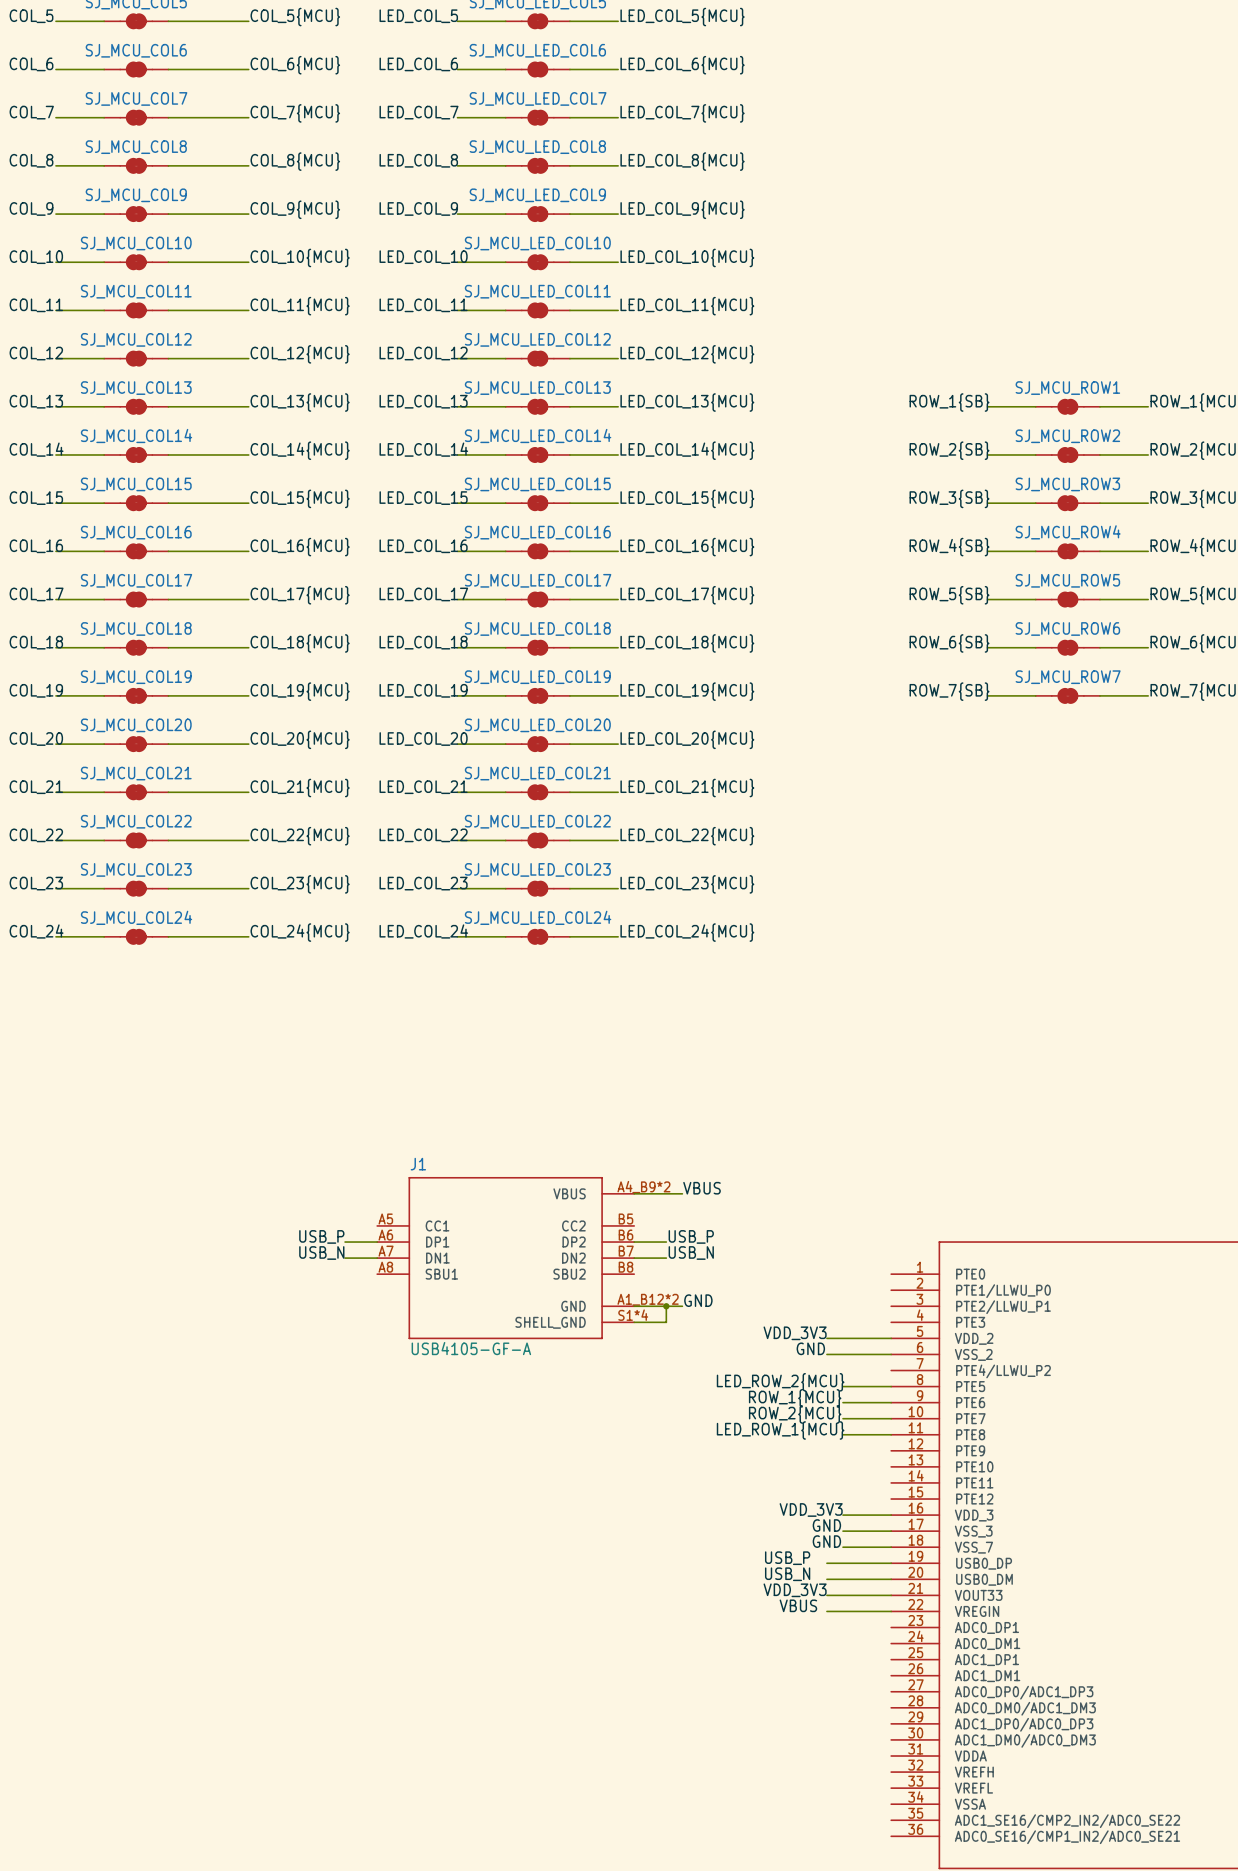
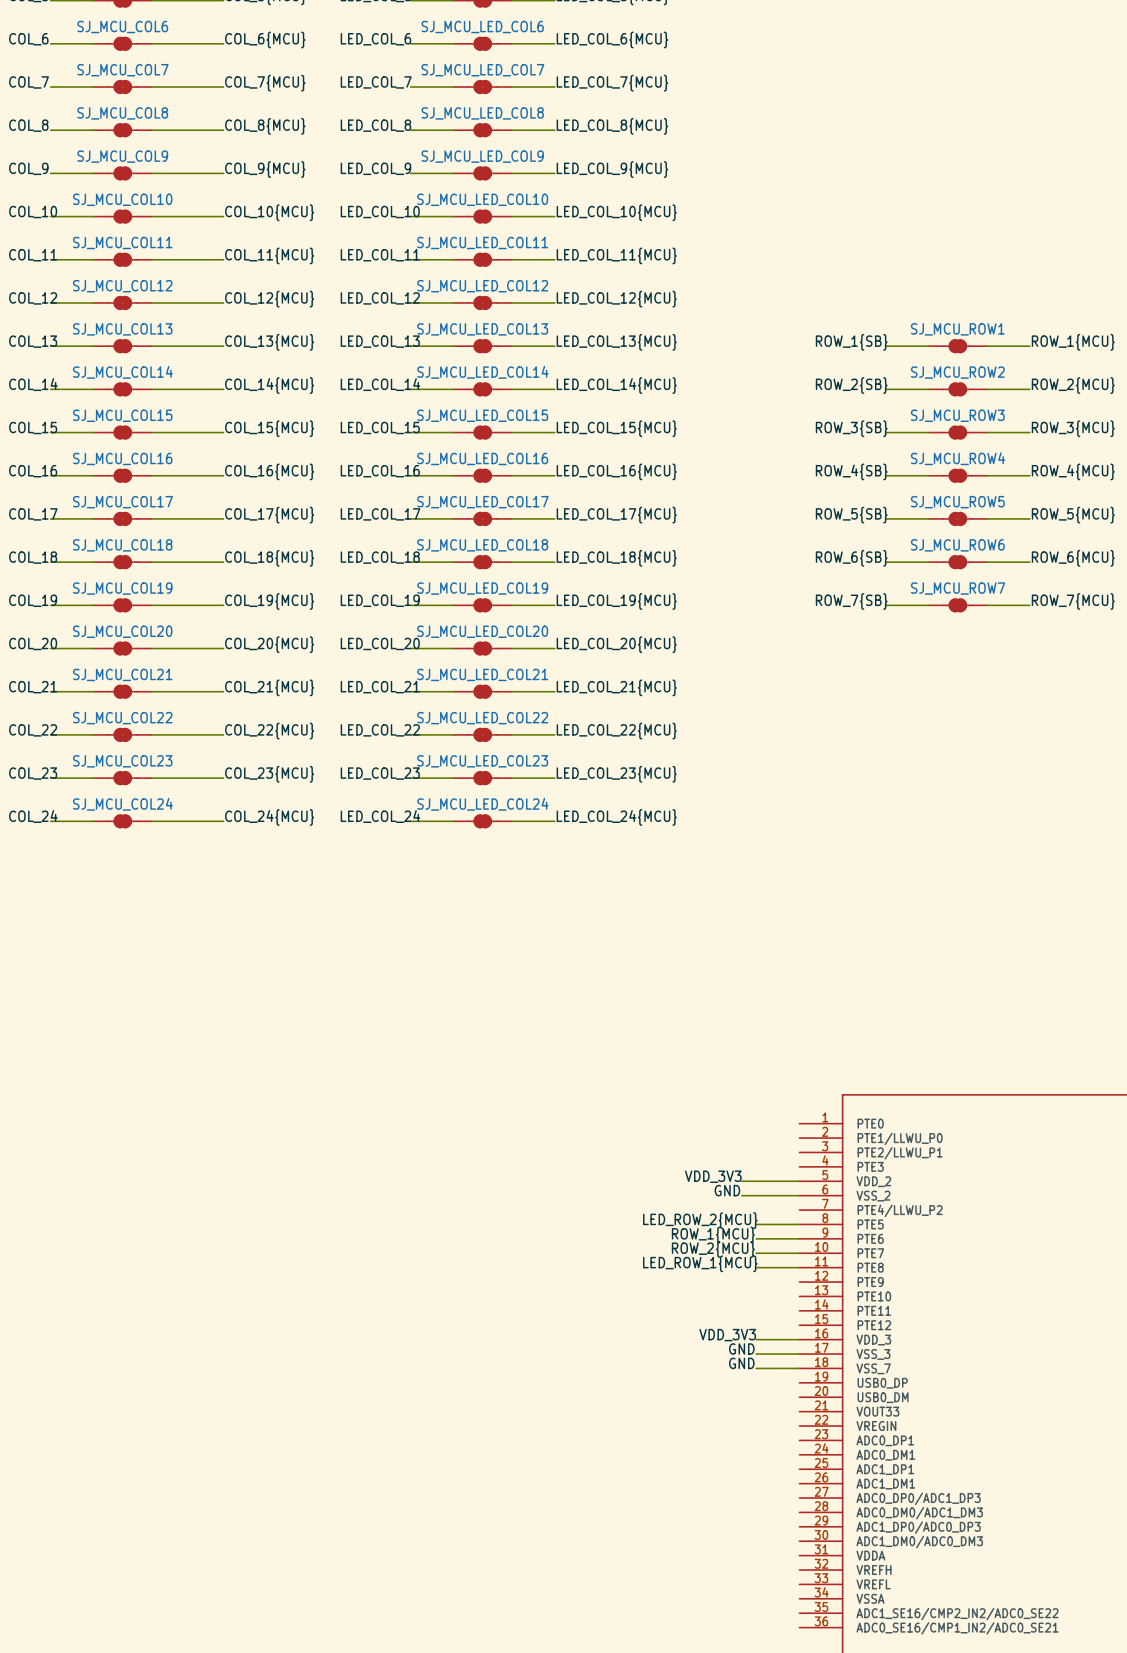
label: VBUS (702, 1188) -> none
wire: (634, 1193) (682, 1193) -> none
label: USB_P (321, 1236) -> none
label: USB_P (691, 1236) -> none
wire: (345, 1242) (377, 1242) -> none
wire: (634, 1242) (666, 1242) -> none
label: USB_N (321, 1253) -> none
label: USB_N (691, 1253) -> none
wire: (345, 1258) (377, 1258) -> none
J1: USB4105-GF-A (505, 1258) -> none
wire: (634, 1258) (666, 1258) -> none
label: GND (698, 1300) -> none
wire: (634, 1306) (682, 1306) -> none
wire: (666, 1306) (666, 1322) (634, 1322) -> none
junction: (666, 1306) -> none
label: USB_P (787, 1558) -> none
wire: (826, 1563) (891, 1563) -> none
label: USB_N (787, 1574) -> none
wire: (826, 1579) (891, 1579) -> none
label: VDD_3V3 (795, 1590) -> none
wire: (826, 1595) (891, 1595) -> none
label: VBUS (798, 1605) -> none
wire: (826, 1611) (891, 1611) -> none

